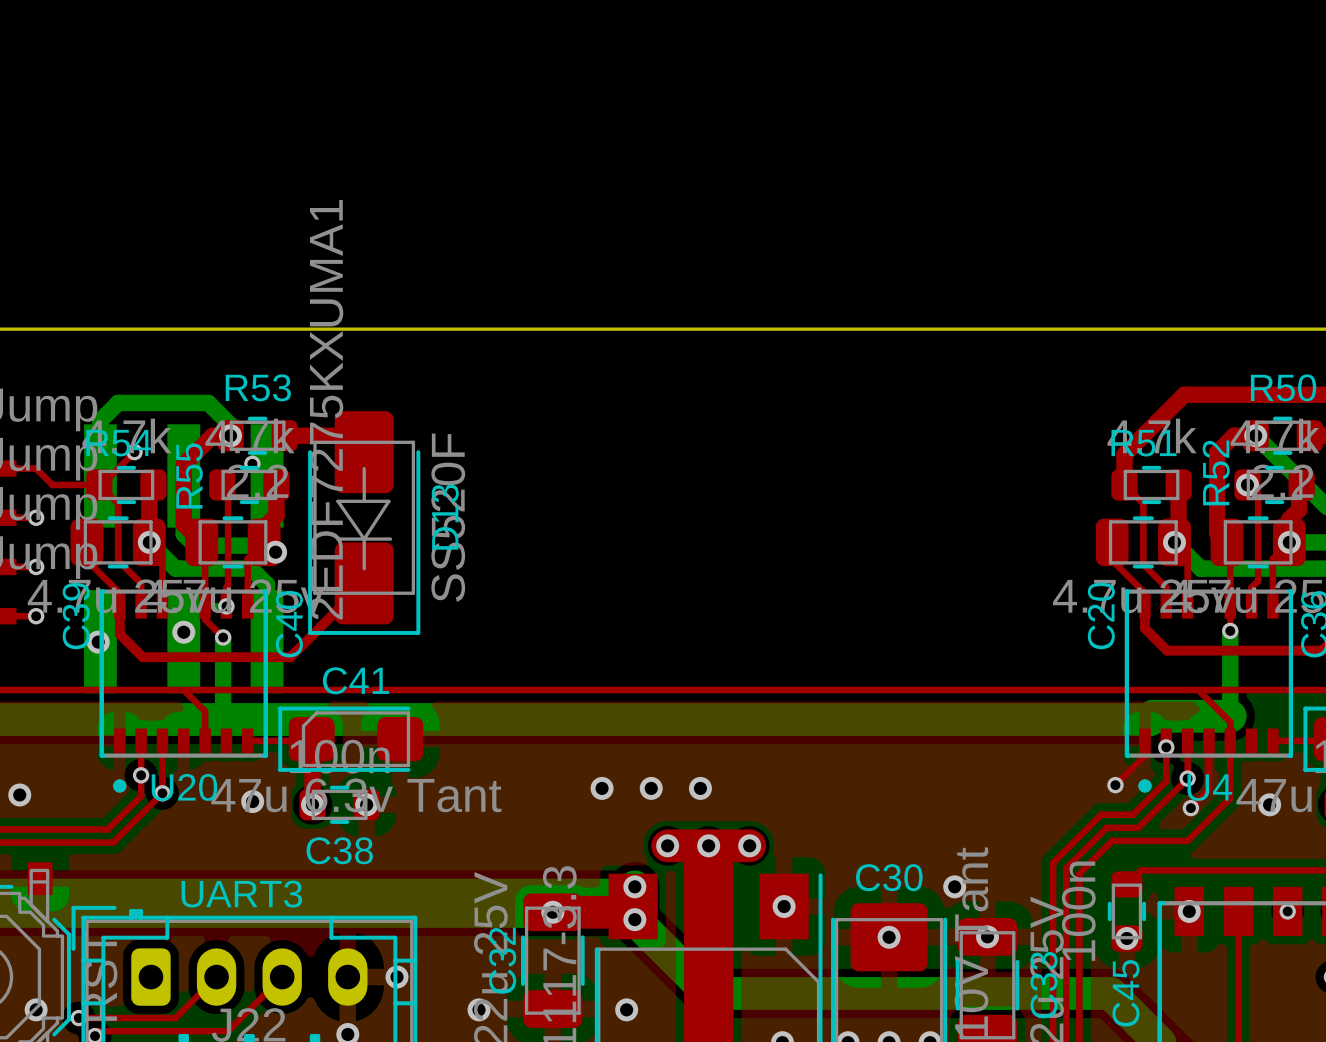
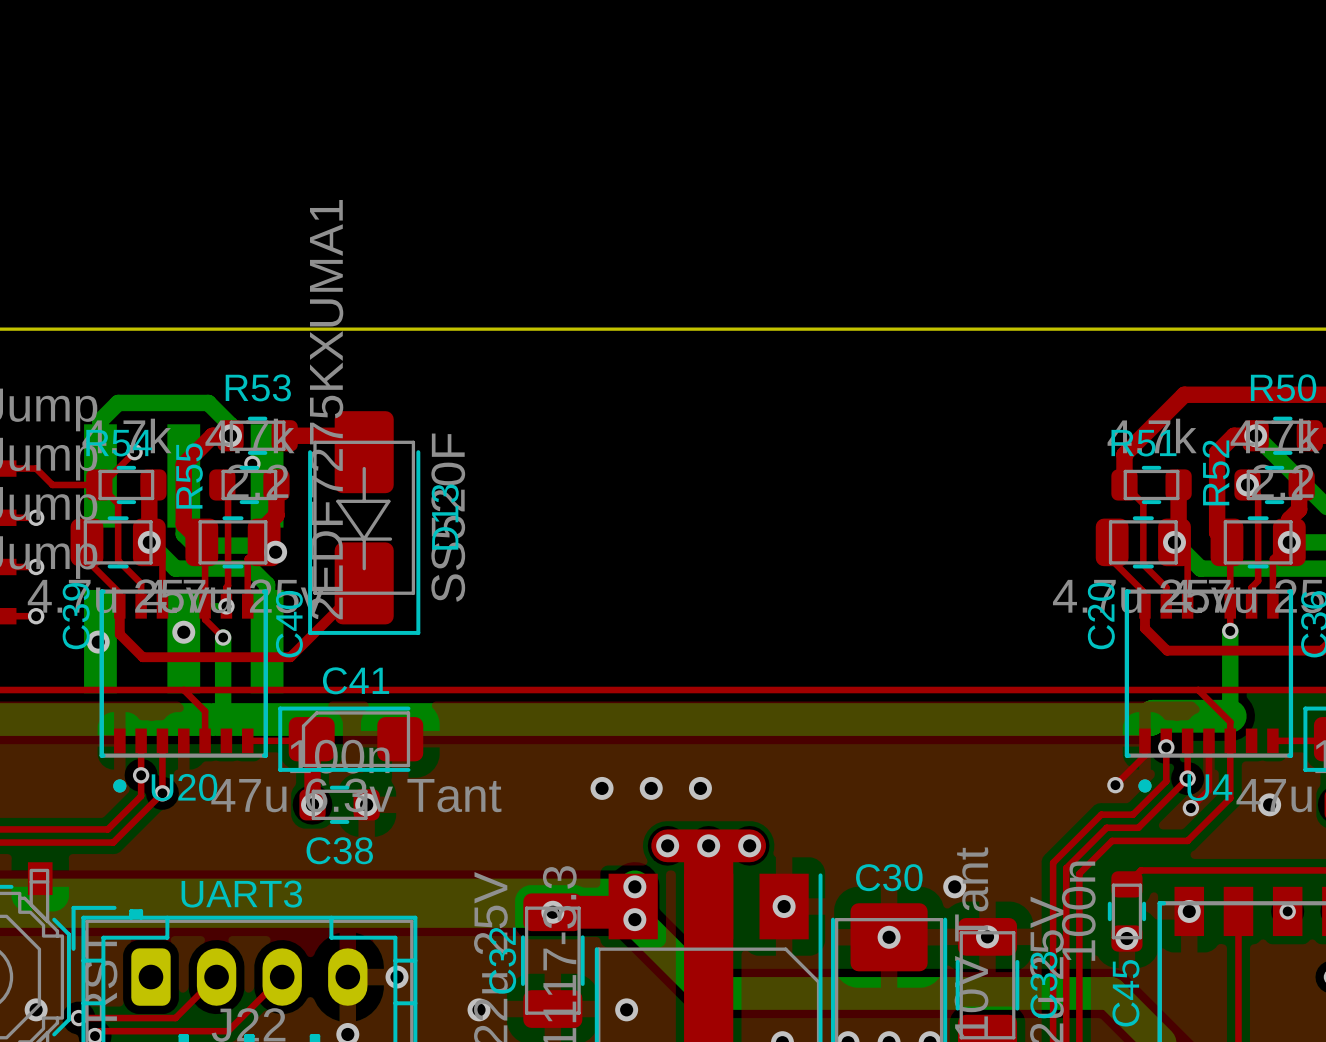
via: (19, 794) -> none
via: (252, 801) -> none

